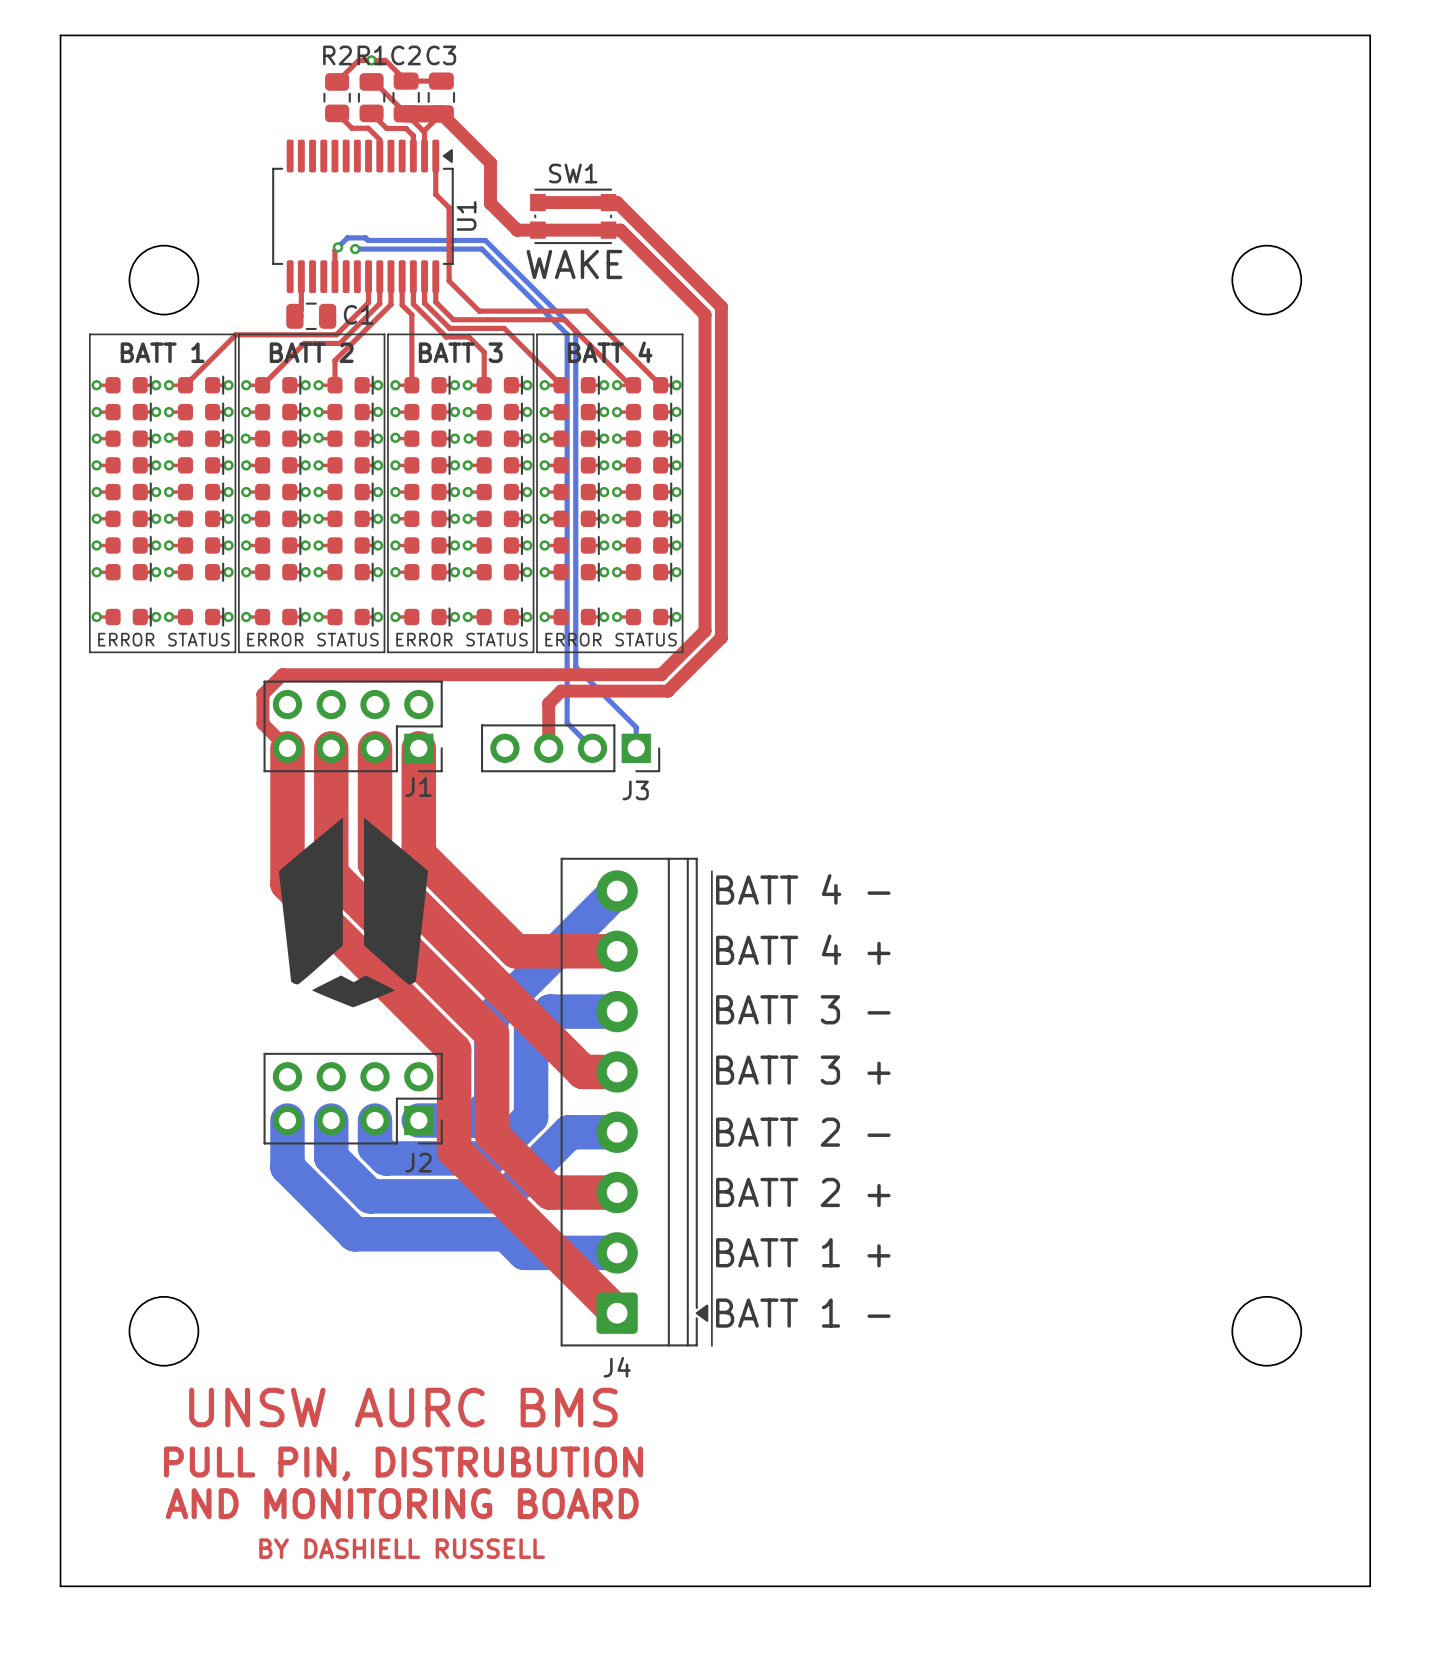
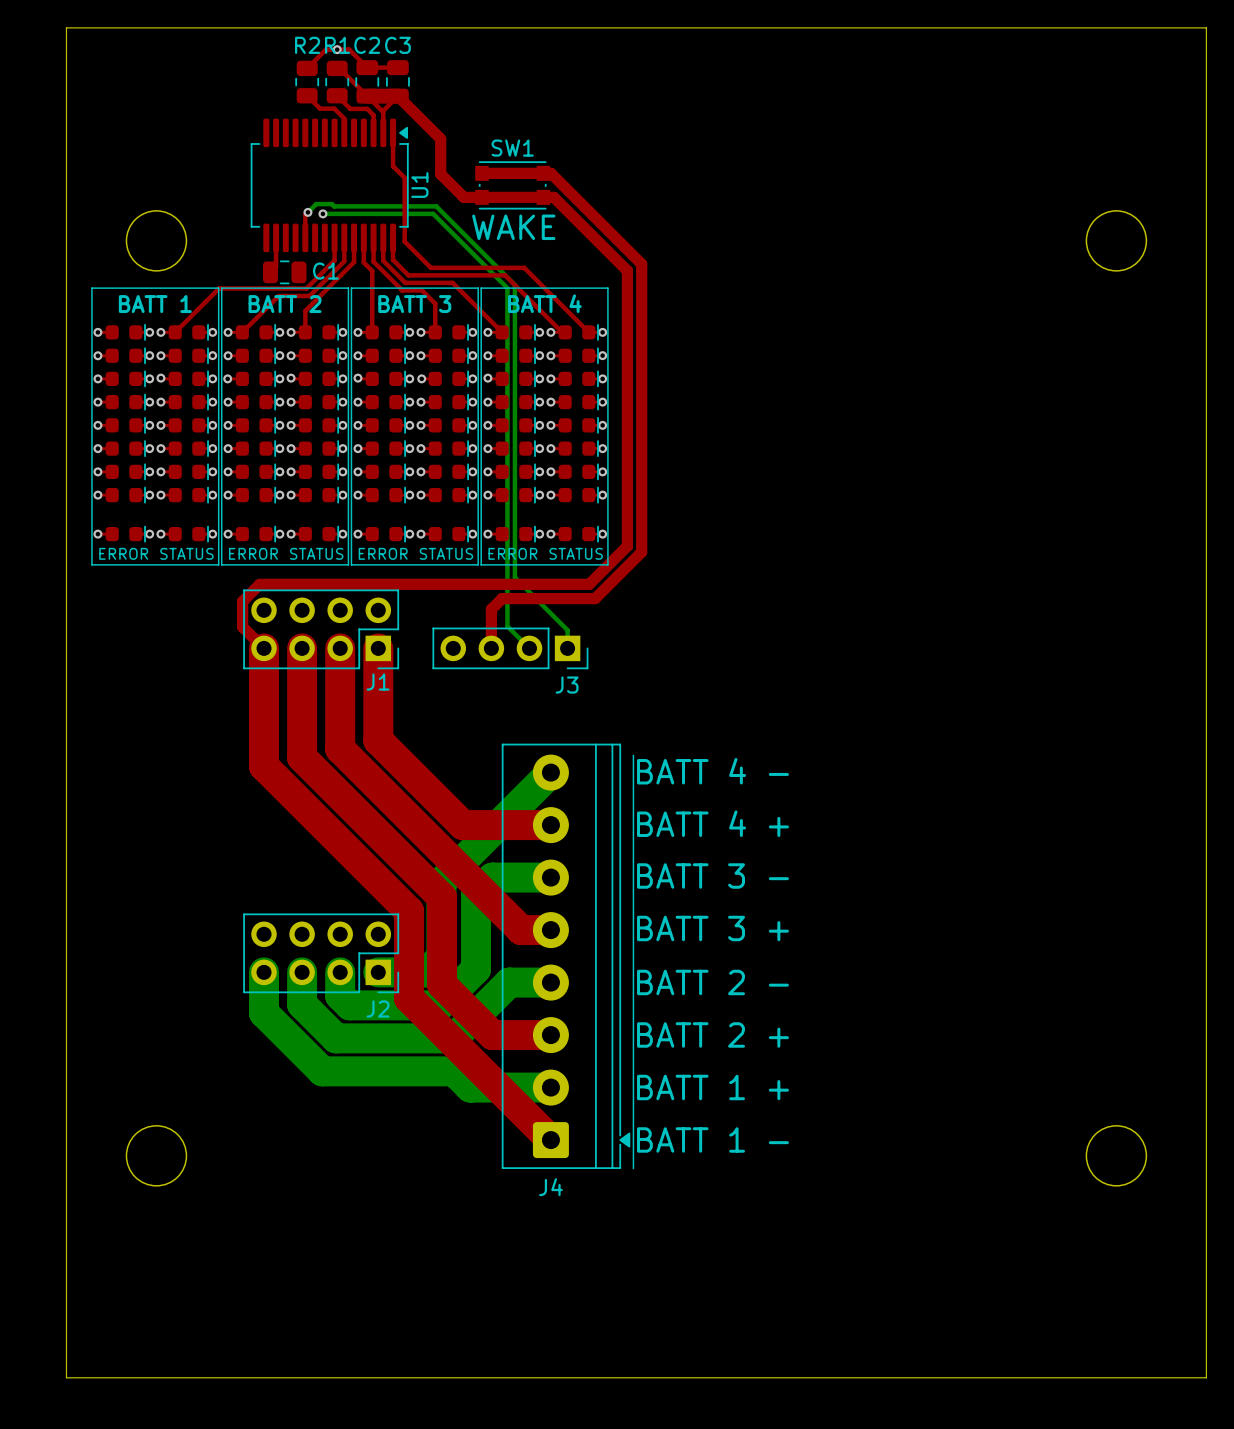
drawing: [278, 817, 429, 1008] -> none
text: UNSW AURC BMS (403, 1407) -> none
text: PULL PIN, DISTRUBUTION (403, 1463) -> none
text: AND MONITORING BOARD (402, 1503) -> none
text: BY DASHIELL RUSSELL (402, 1548) -> none

